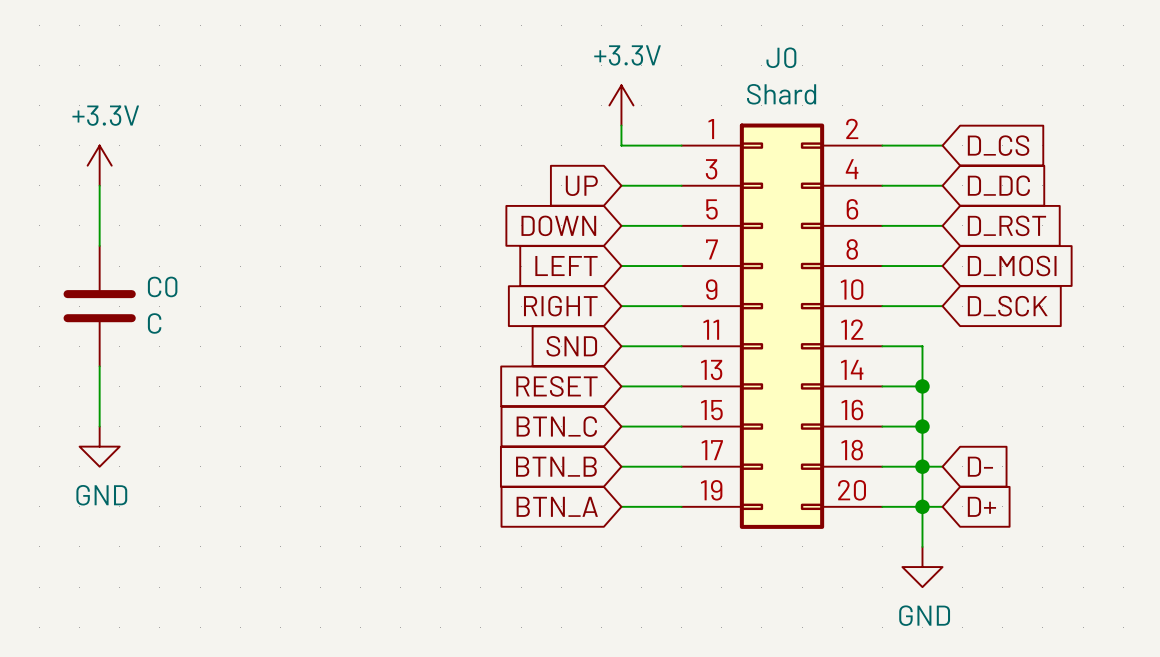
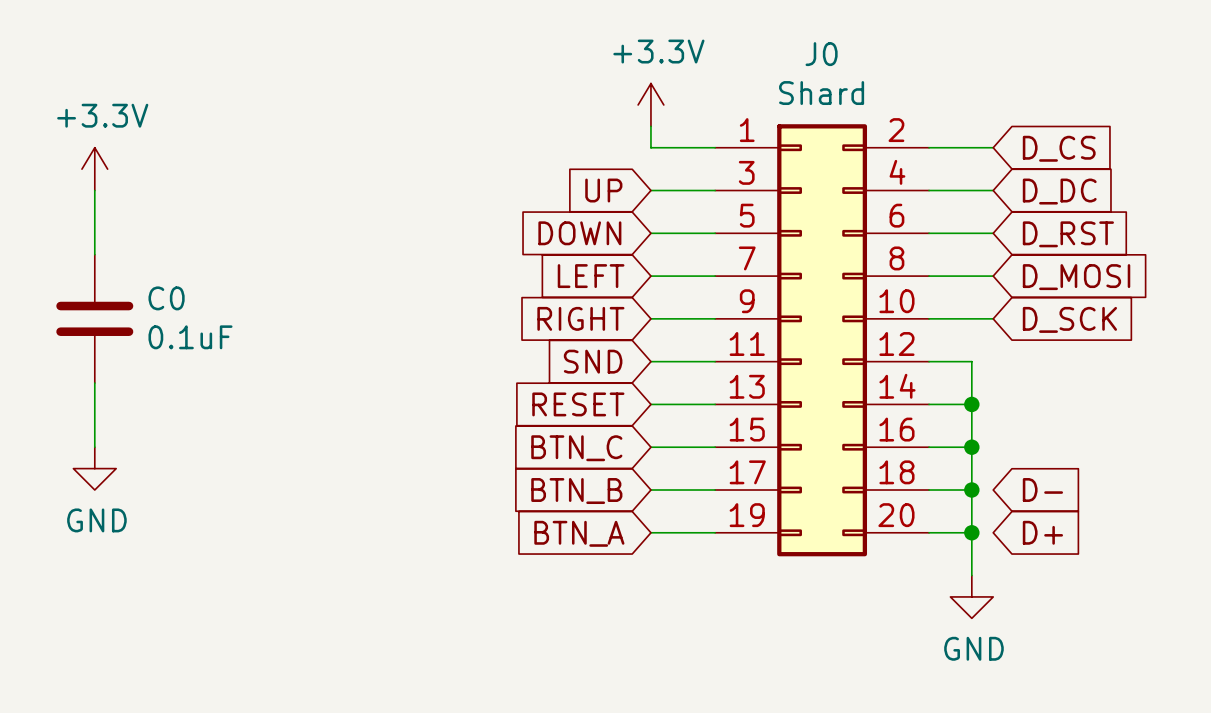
C0 value: C (154, 323) -> 0.1uF (190, 337)
wire: (922, 466) (942, 466) -> none
wire: (922, 506) (942, 506) -> none

